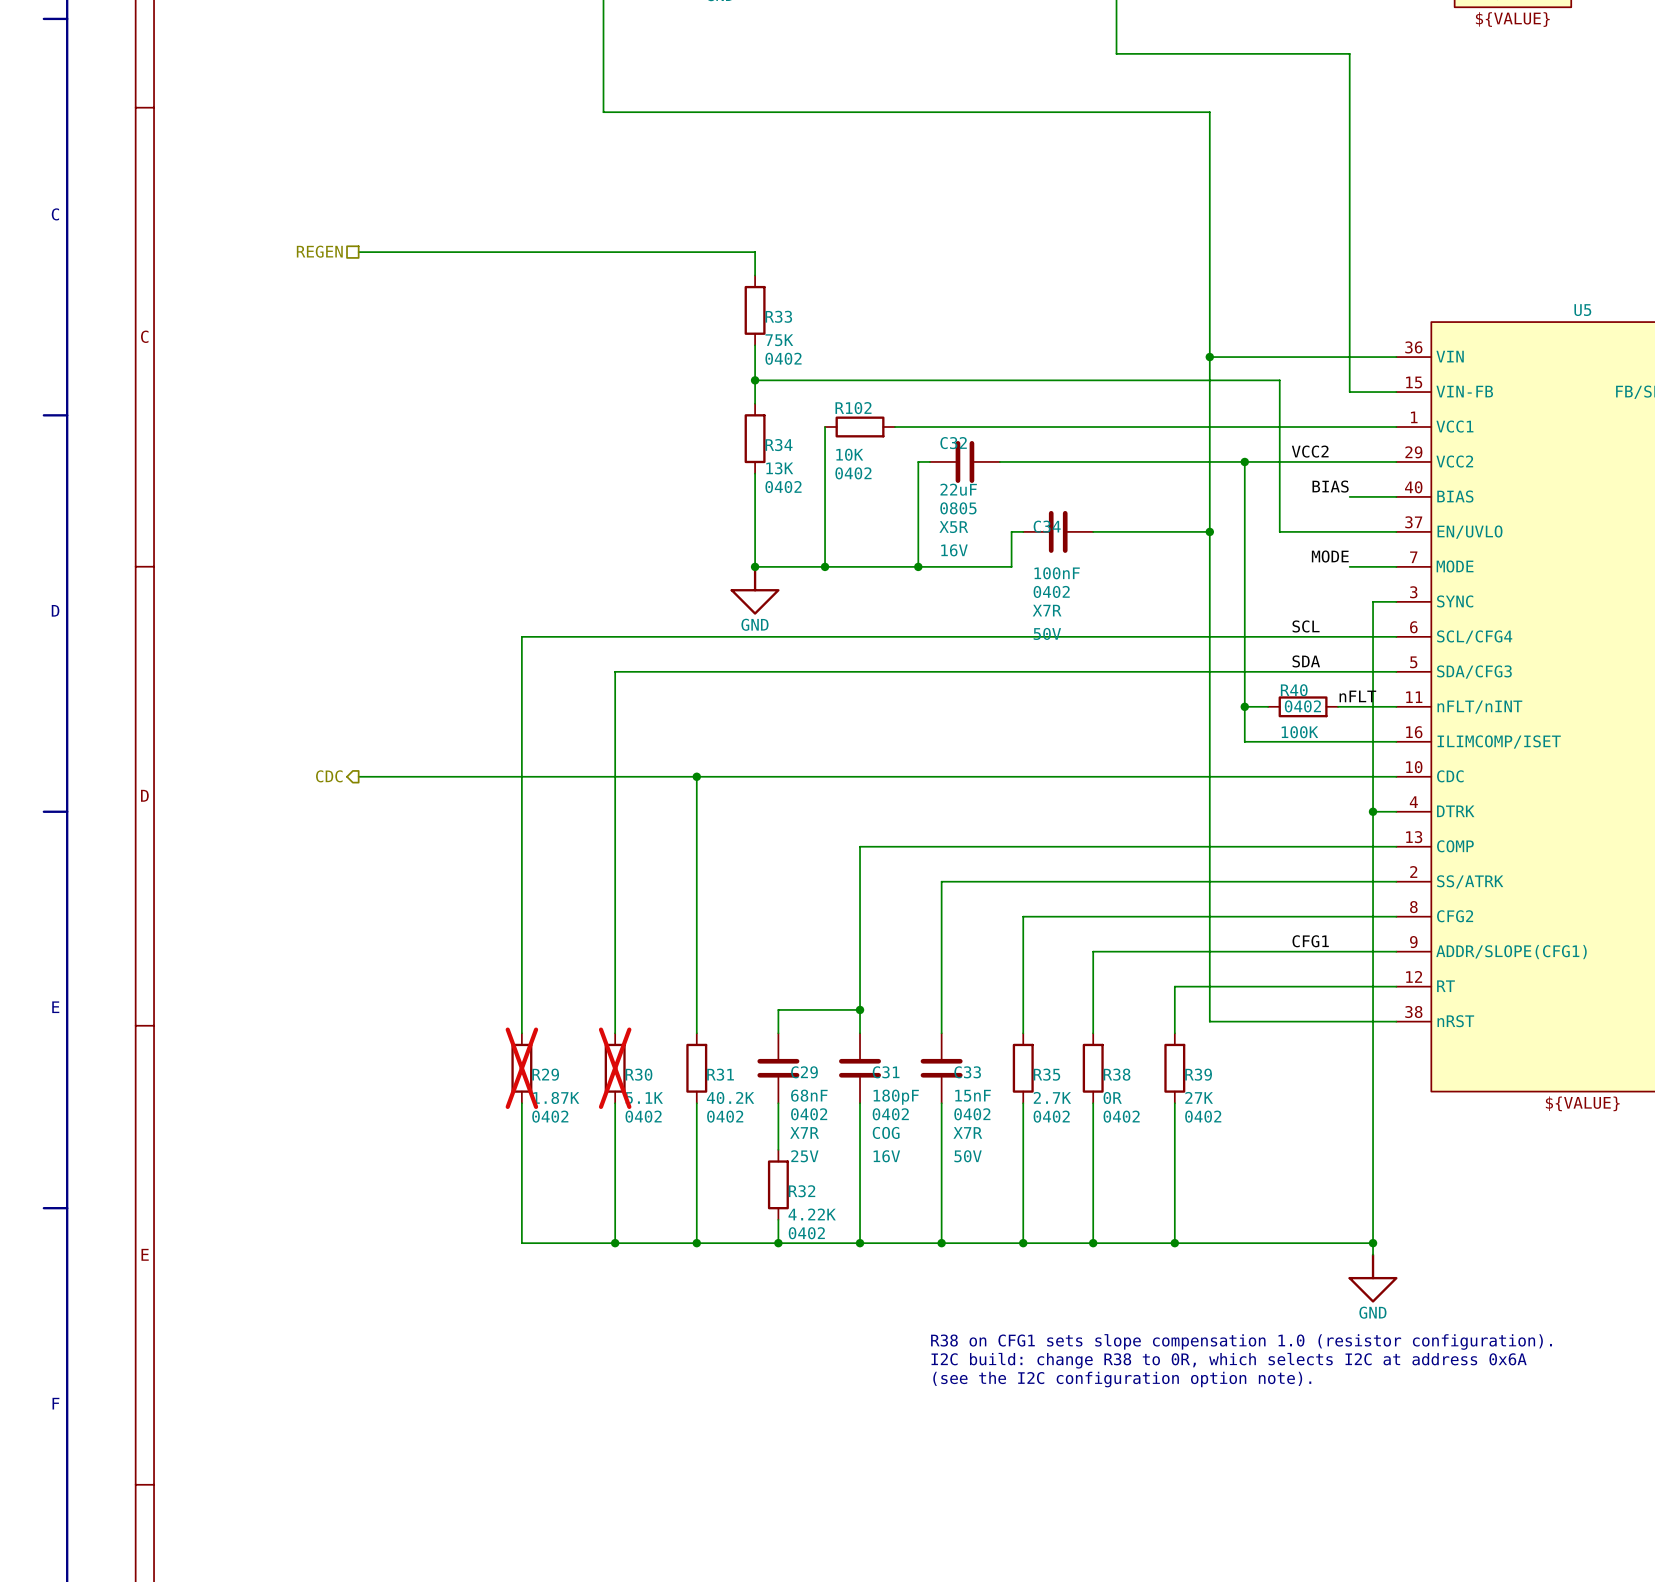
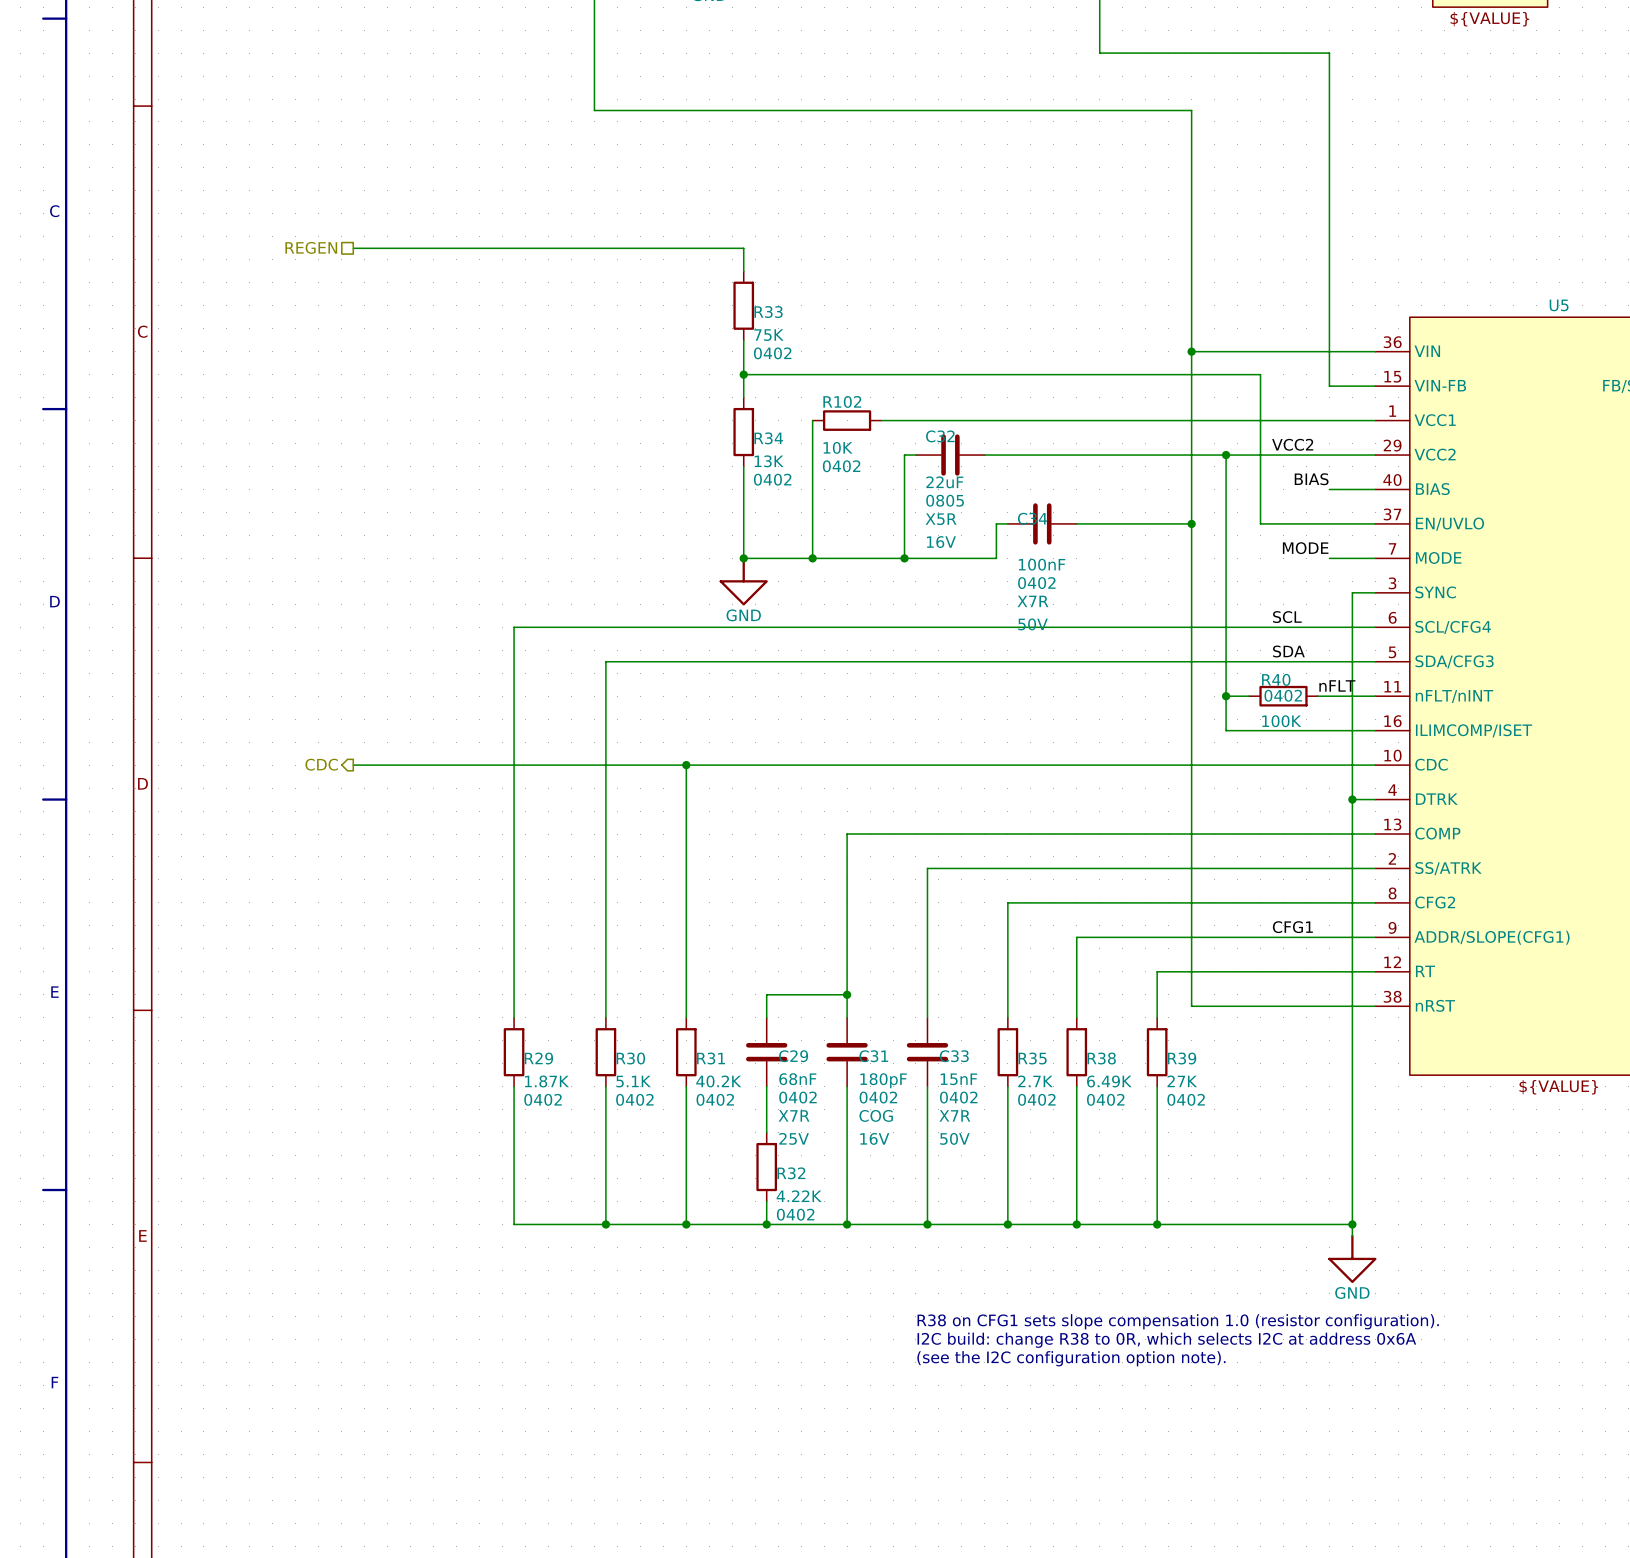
R29 do-not-place cross: (521, 1068) -> none
R30 do-not-place cross: (615, 1068) -> none
R38 value: 0R (1112, 1097) -> 6.49K (1109, 1081)

